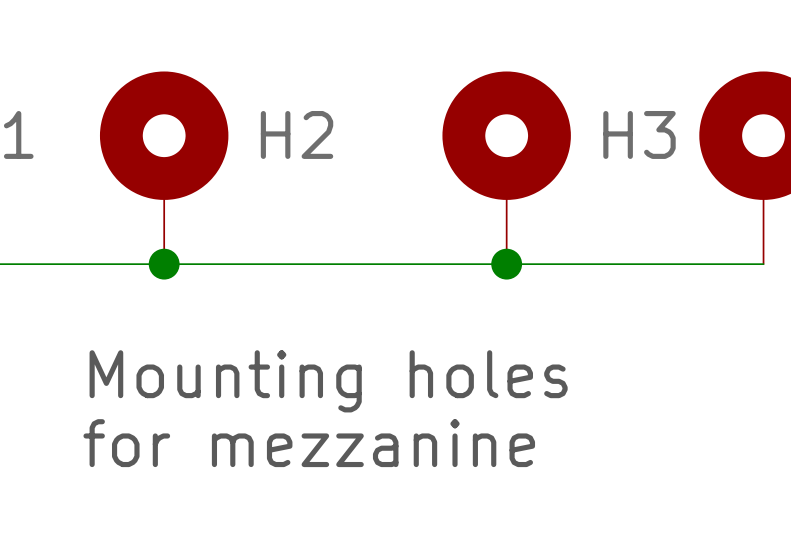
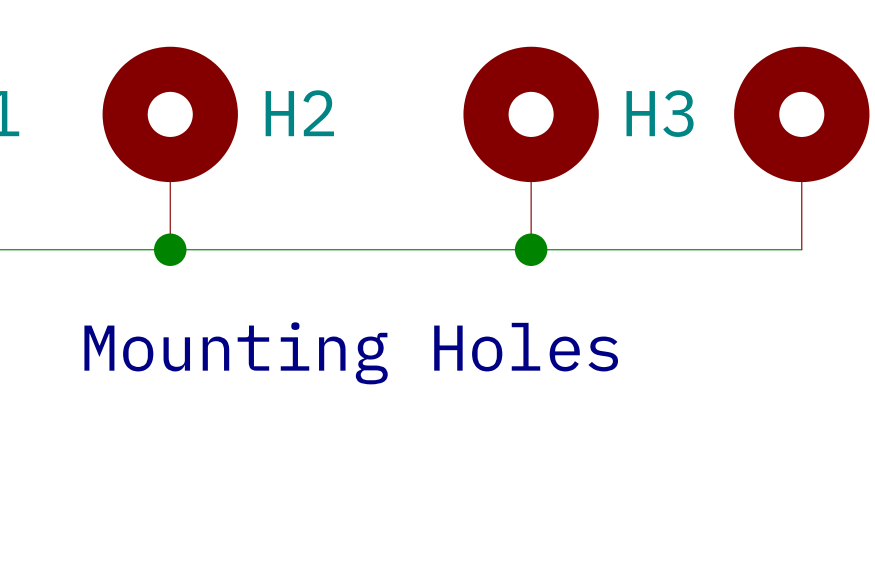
text: Mounting holes (328, 381) -> Mounting Holes (351, 353)
text: for mezzanine (309, 443) -> none

